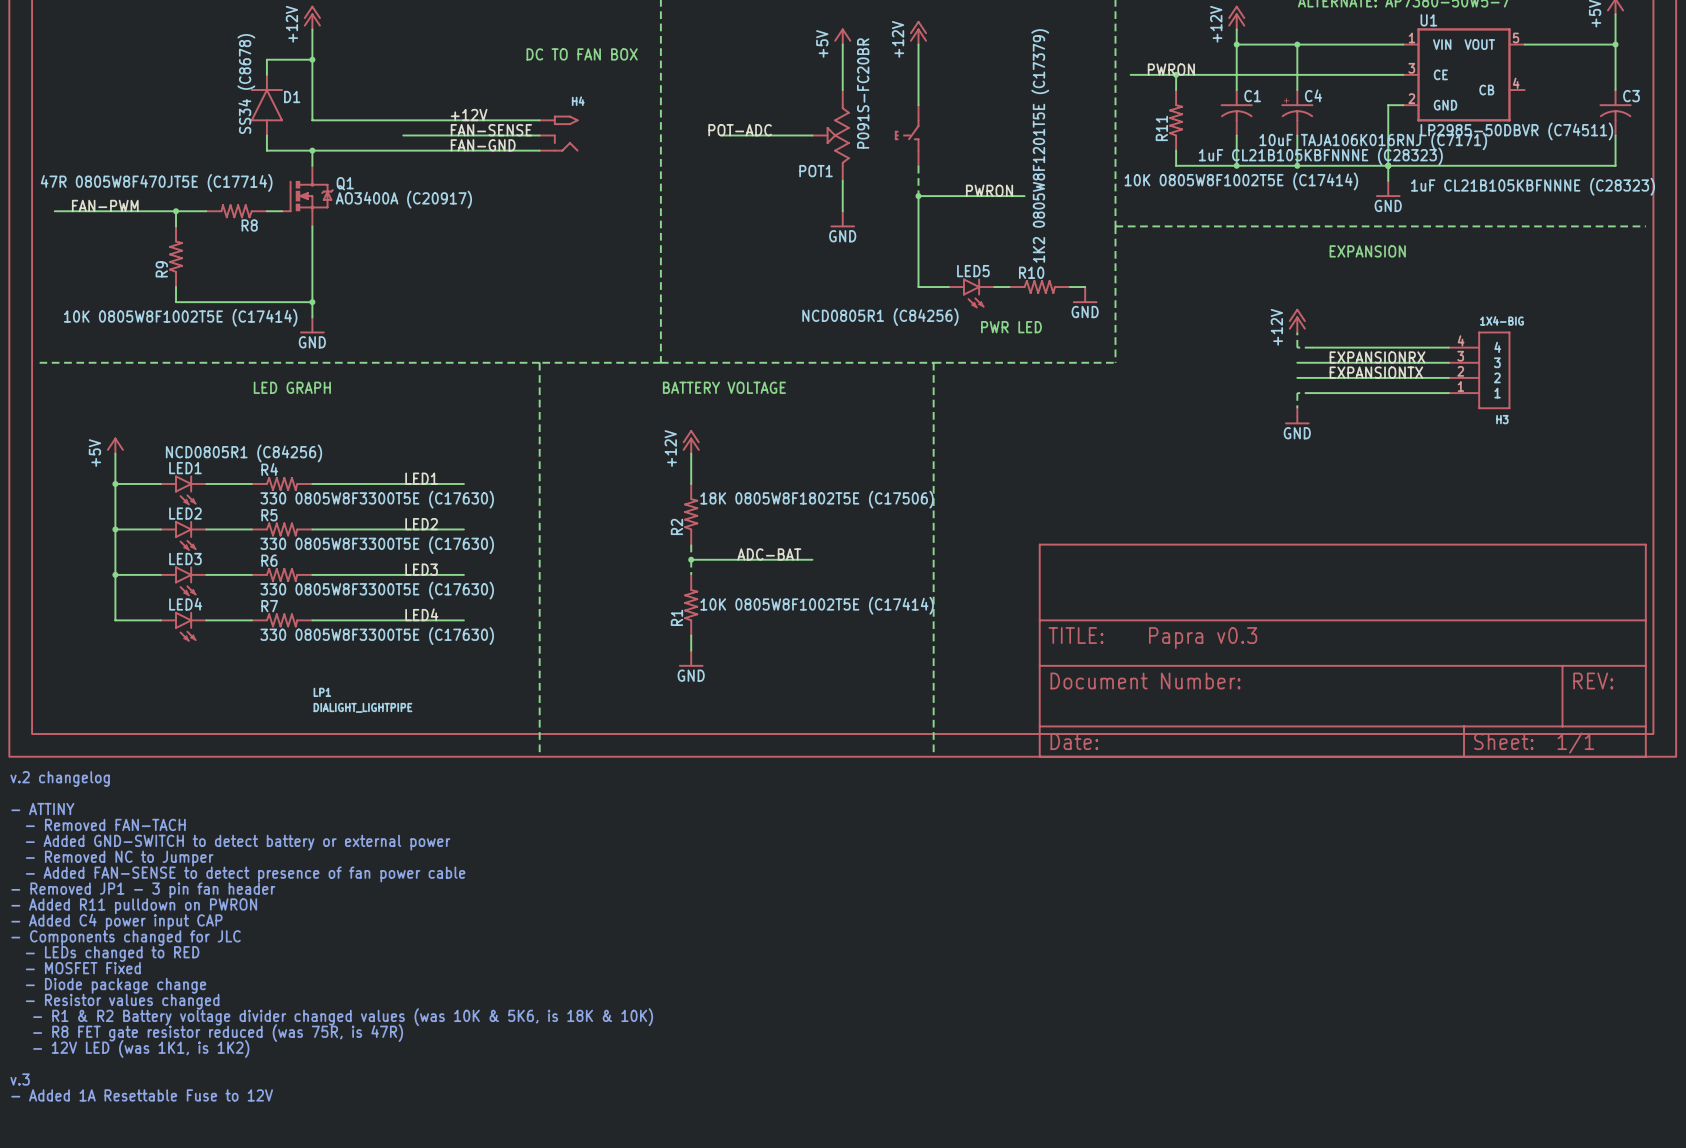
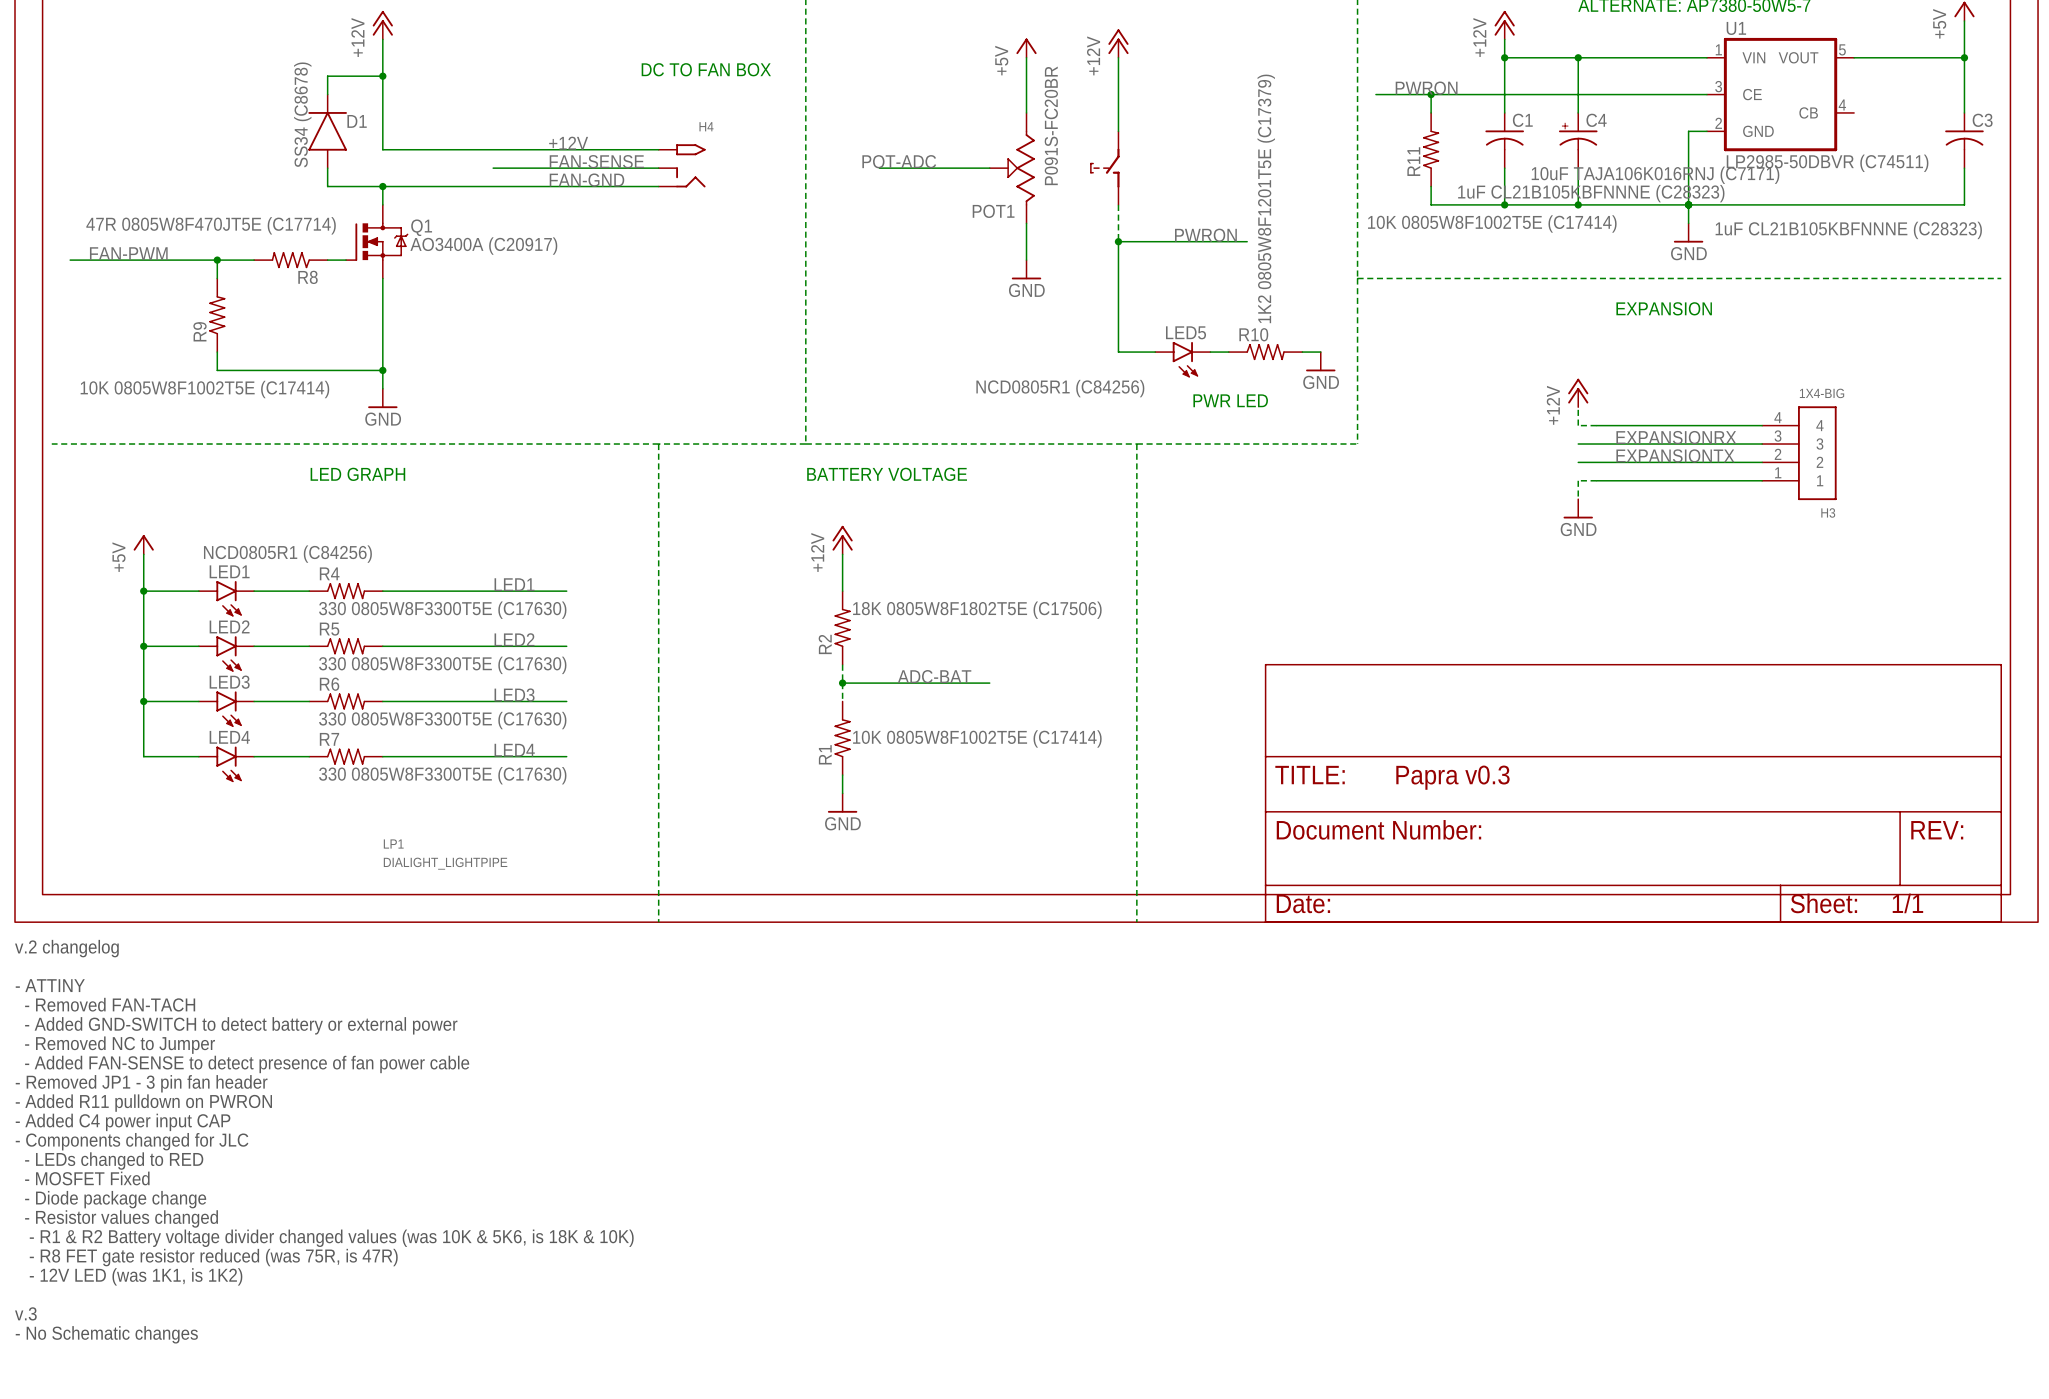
text: - Added 1A Resettable Fuse to 12V (142, 1095) -> - No Schematic changes (106, 1334)

